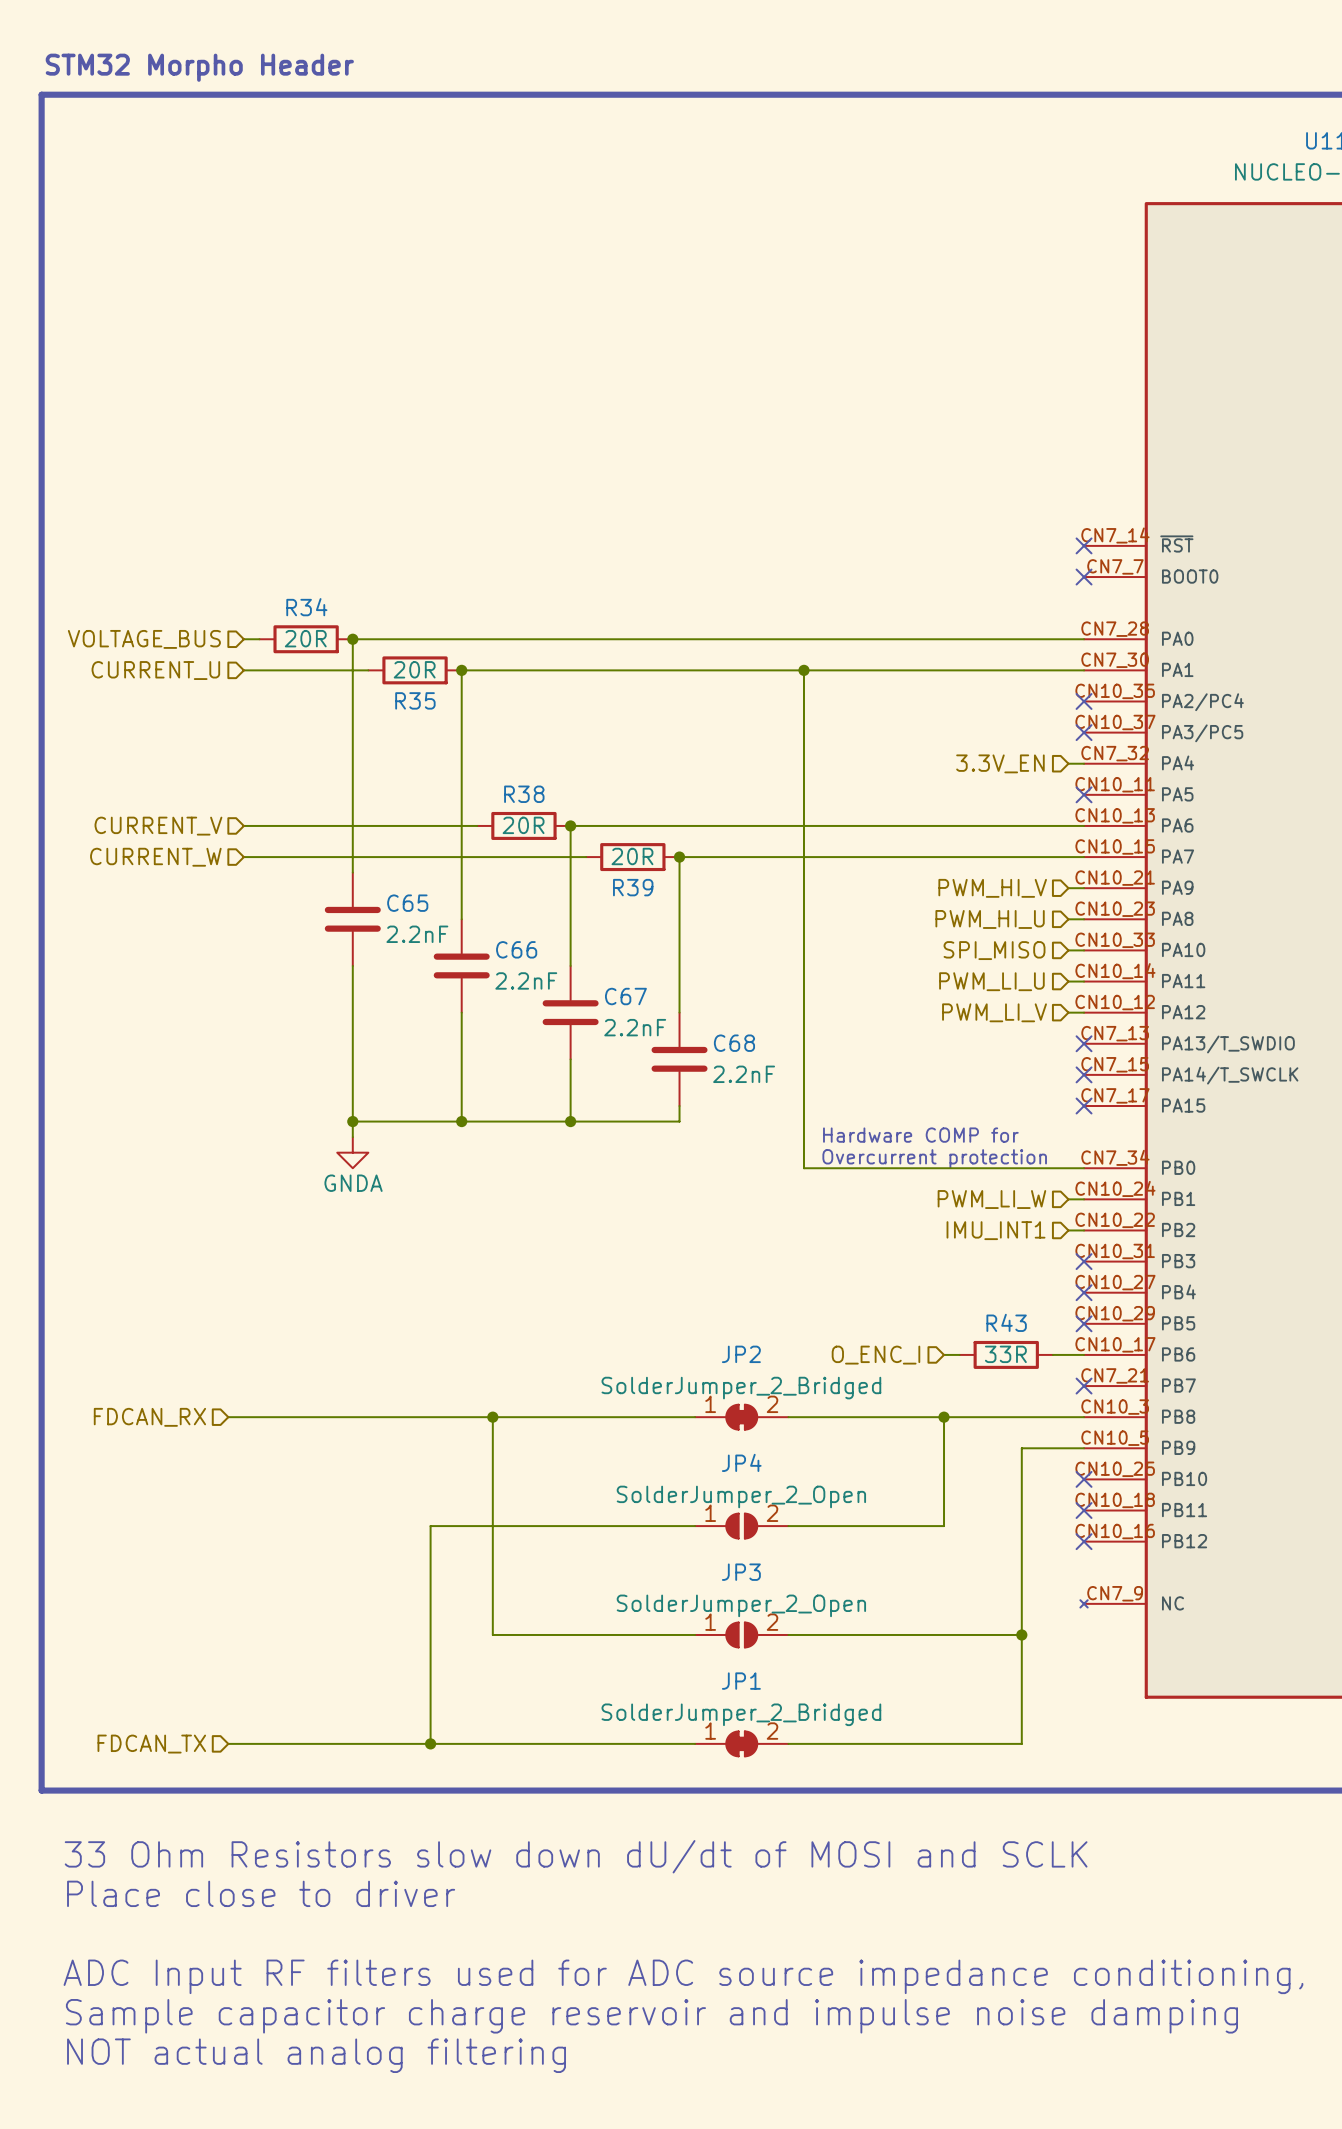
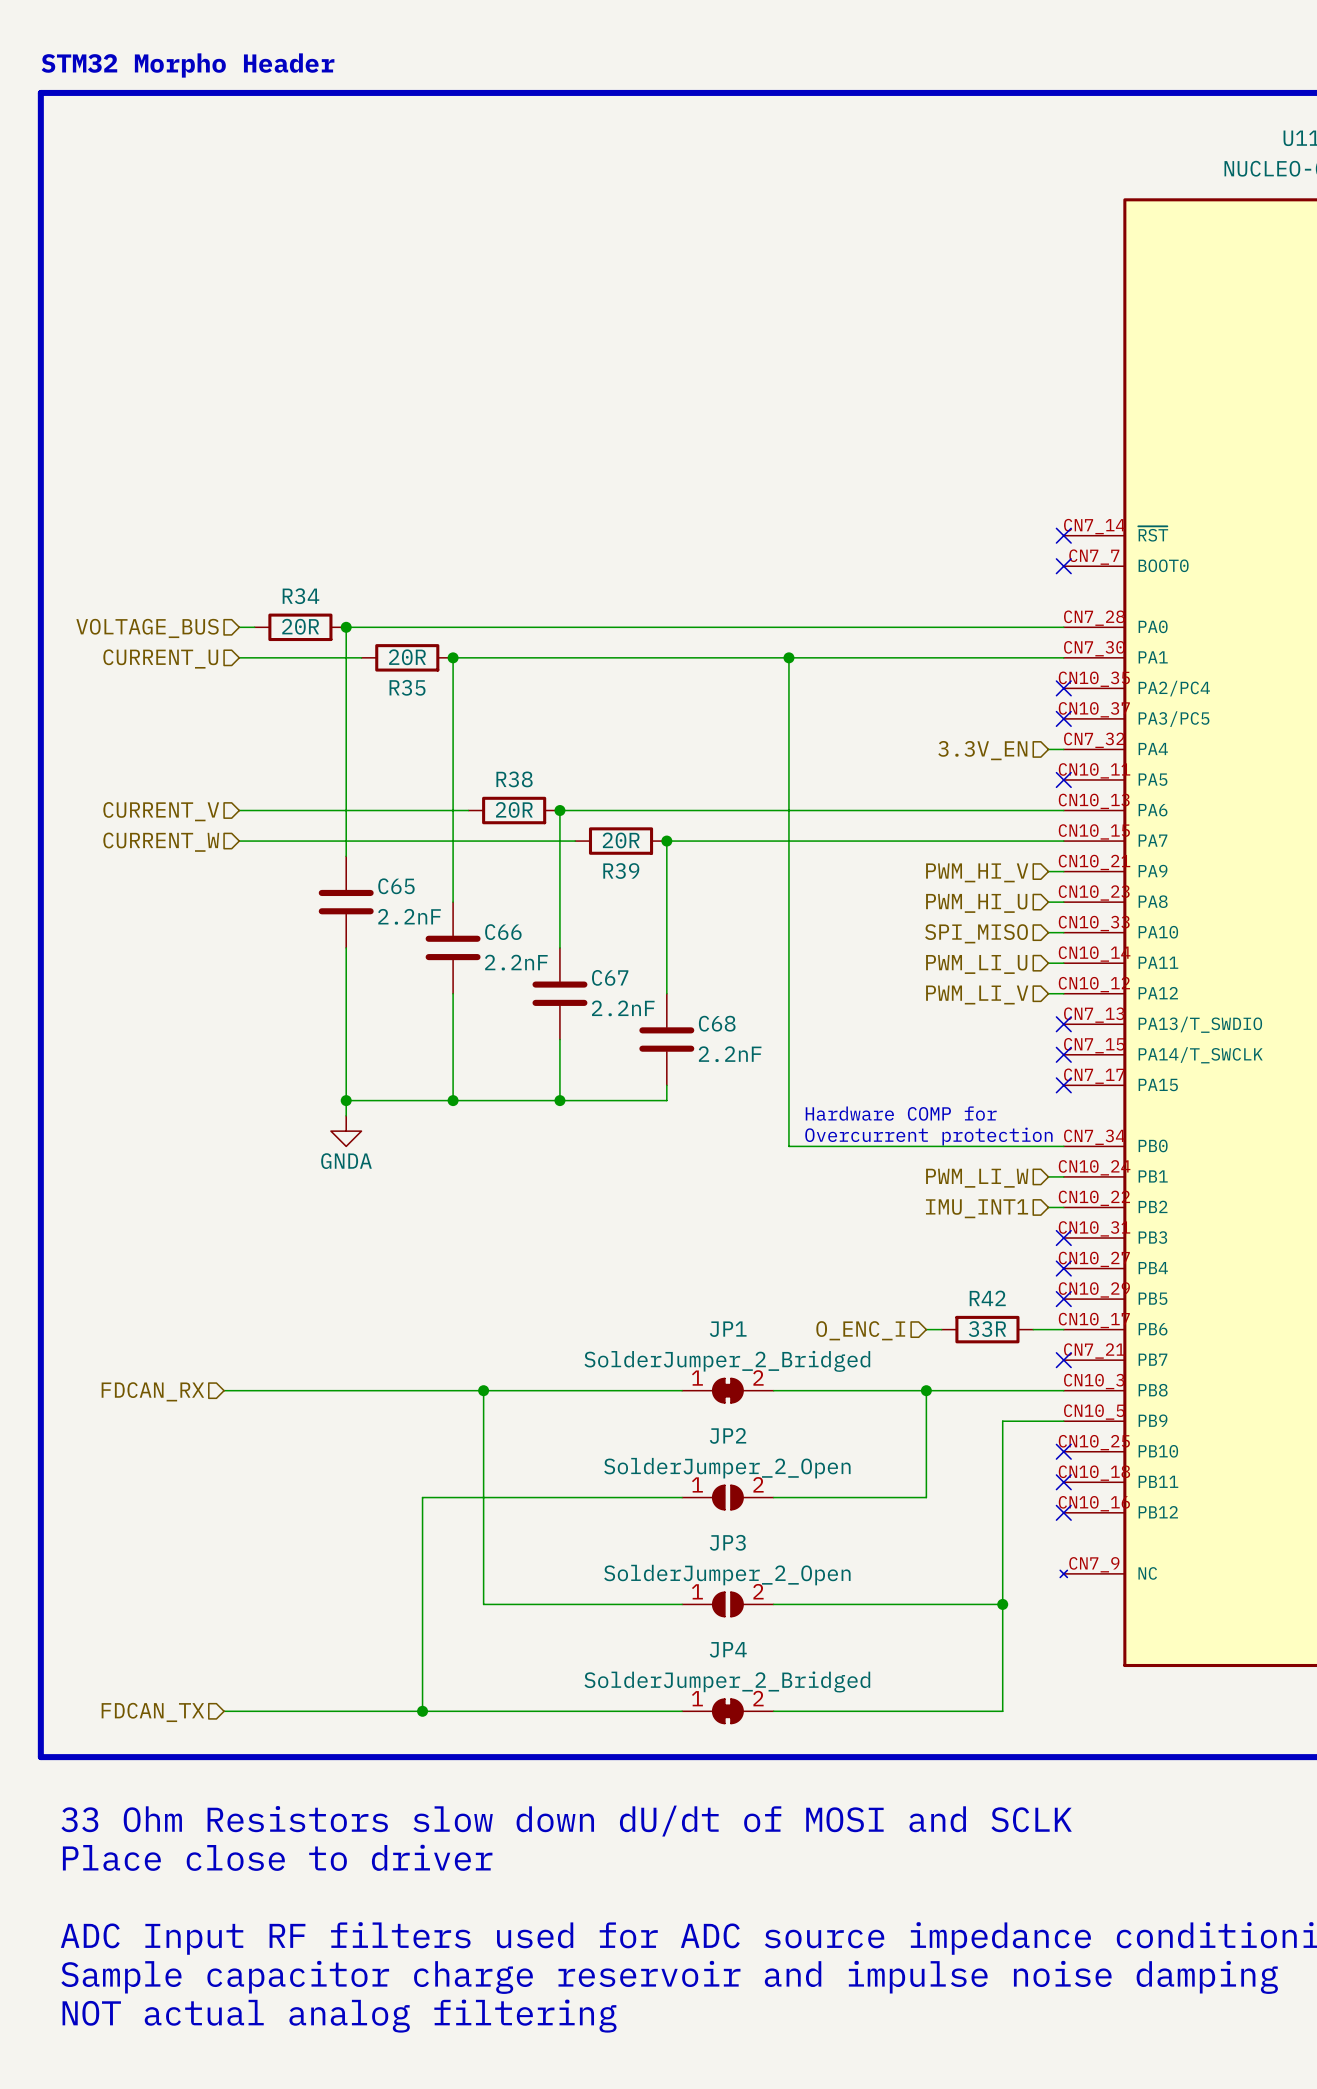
R43 name: R43 (1006, 1322) -> R42 (987, 1298)
JP2 name: JP2 (741, 1354) -> JP1 (728, 1329)
JP4 name: JP4 (741, 1462) -> JP2 (728, 1435)
JP1 name: JP1 (741, 1681) -> JP4 (728, 1649)

